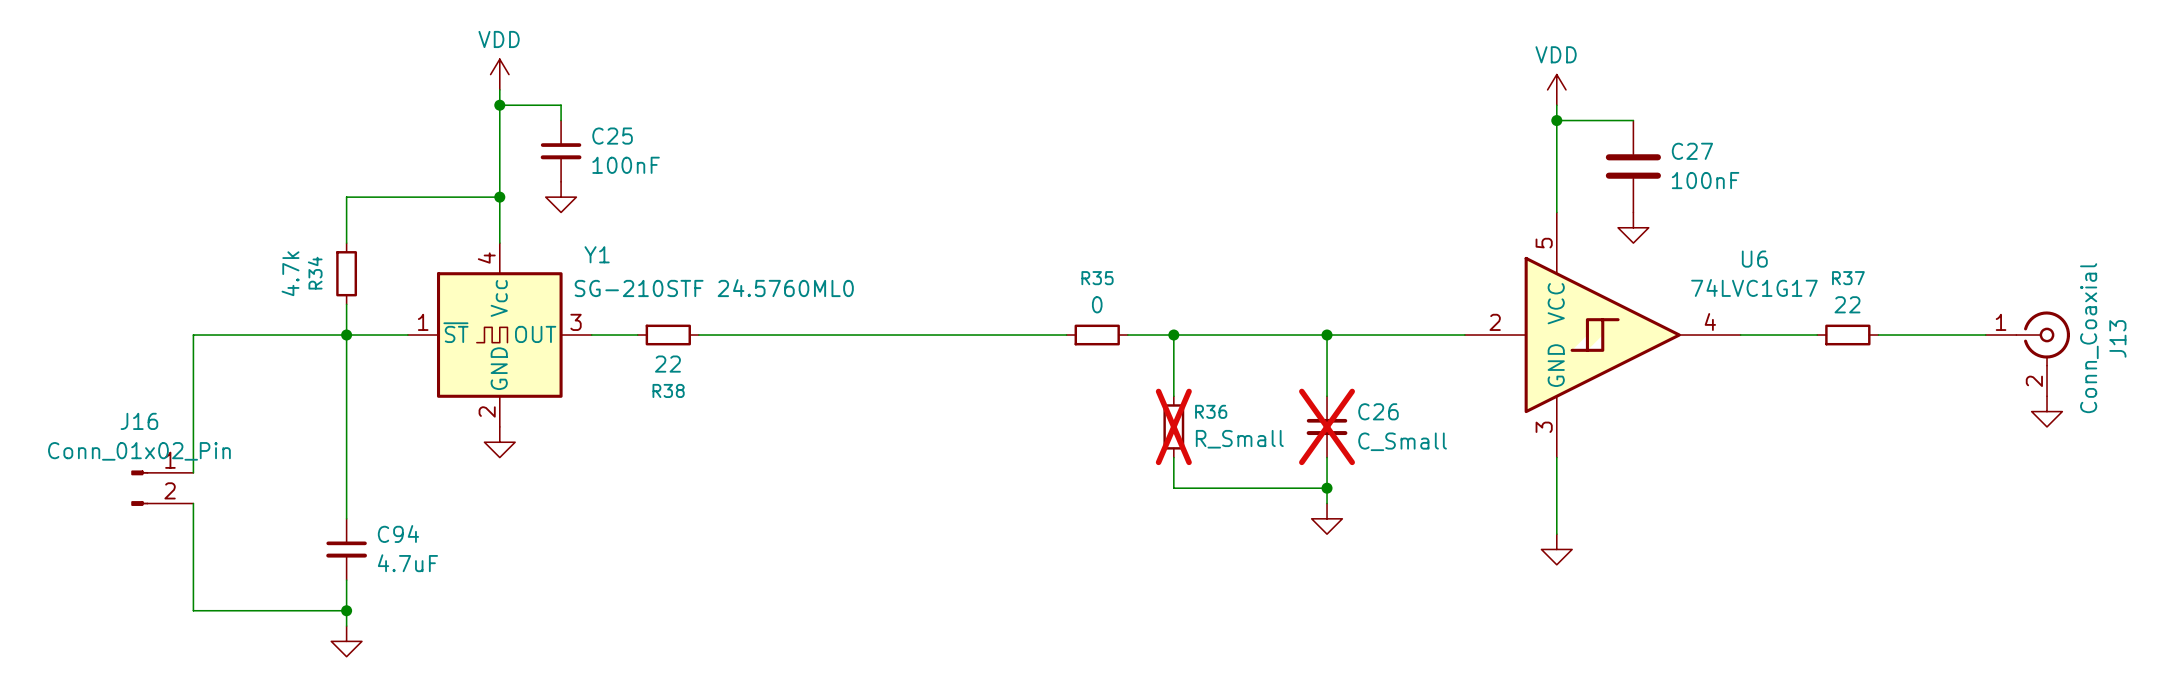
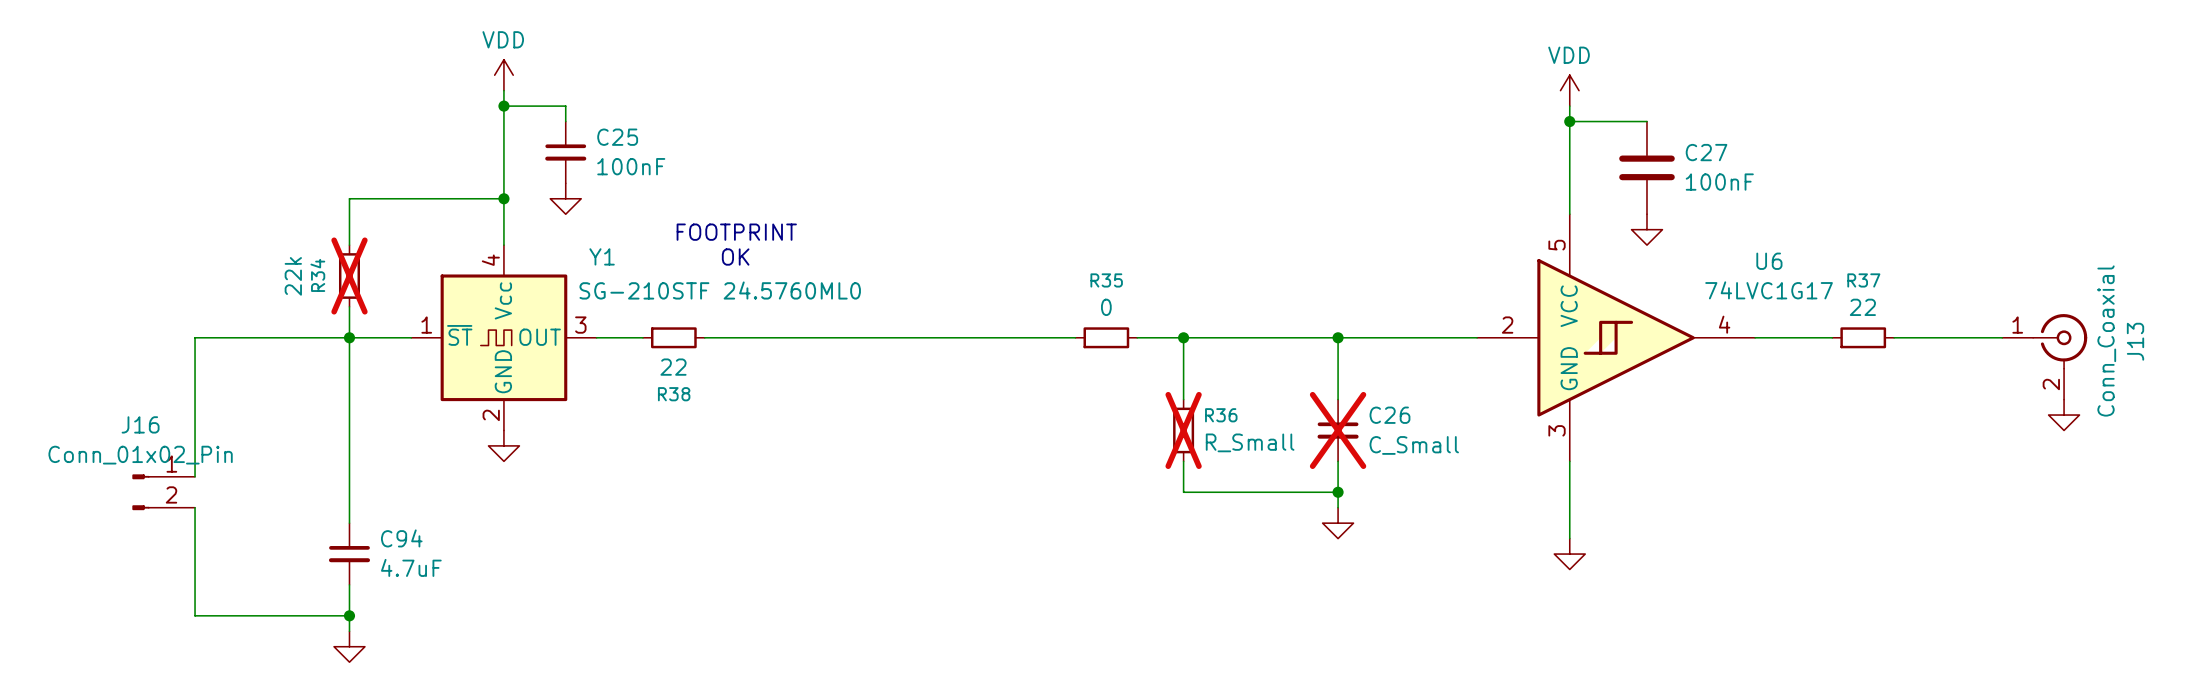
text: none -> FOOTPRINT (736, 232)
text: none -> OK (735, 257)
R34 value: 4.7k (290, 273) -> 22k (293, 276)
R34 do-not-place cross: none -> (349, 276)

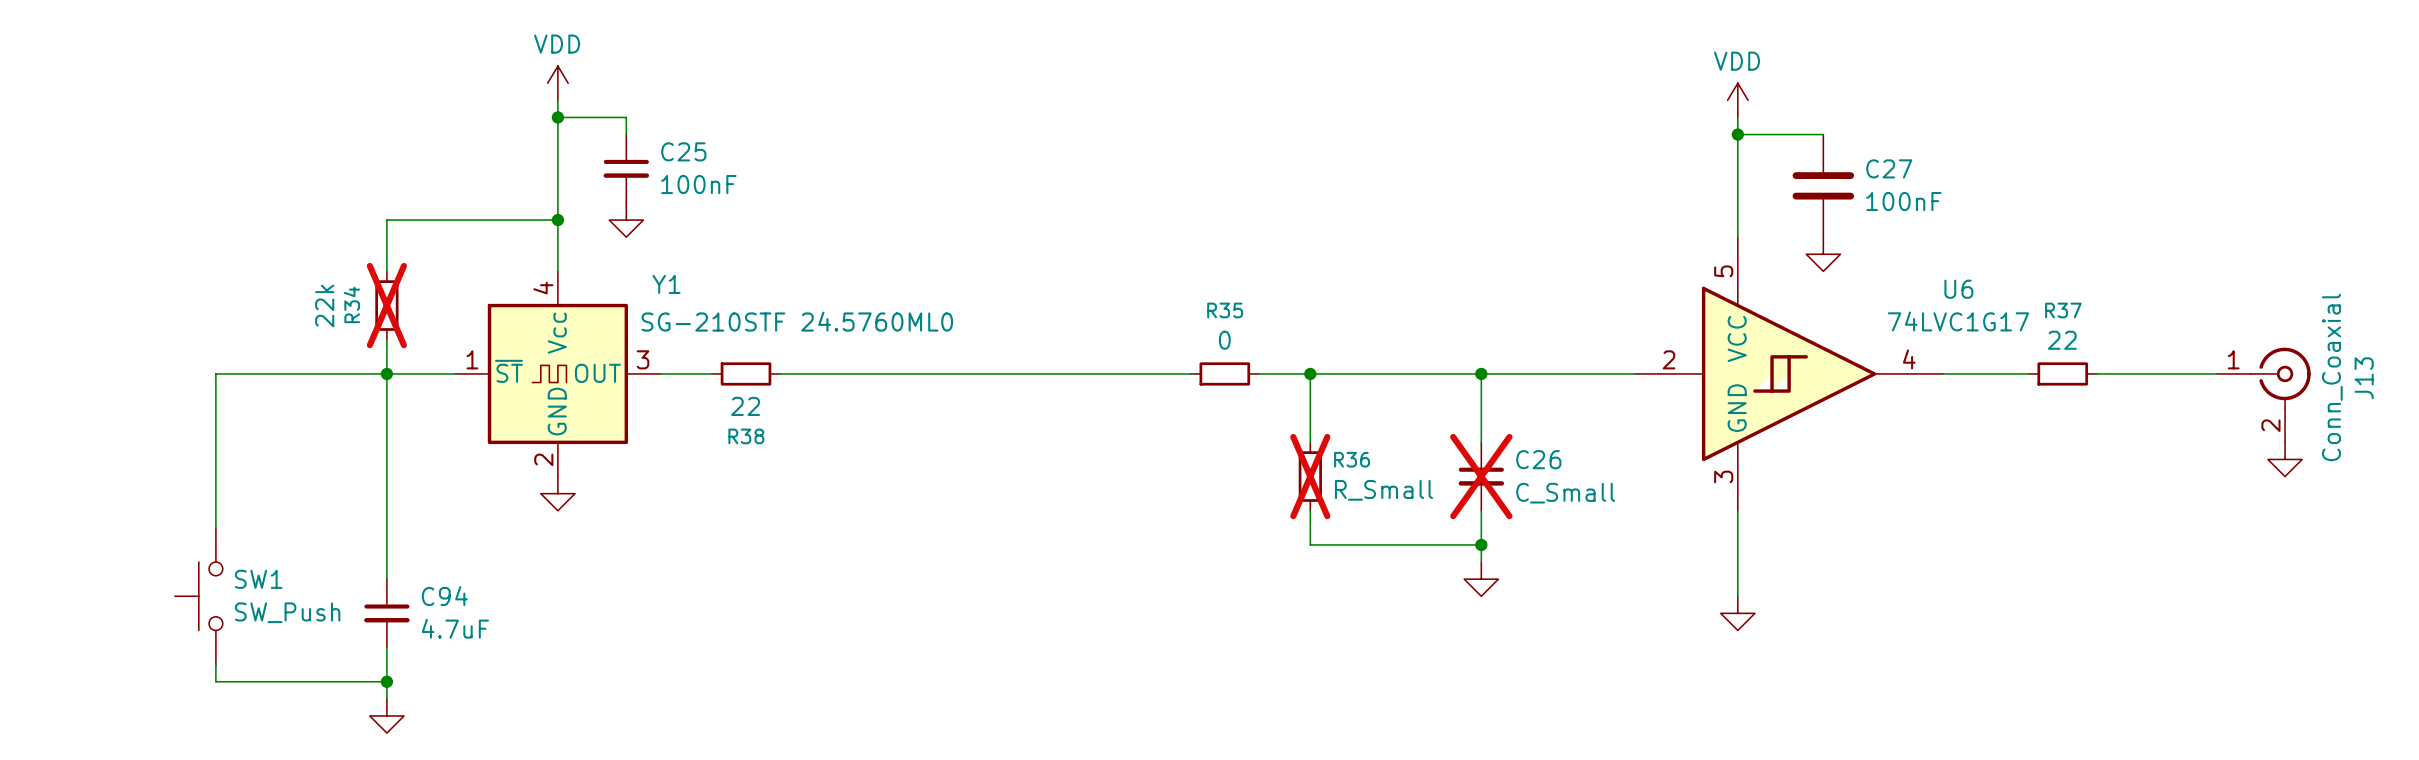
text: FOOTPRINT (736, 232) -> none
text: OK (735, 257) -> none
J16: Conn_01x02_Pin (163, 492) -> none
wire: (195, 507) (195, 600) -> none
SW1: none -> SW_Push (198, 596)

